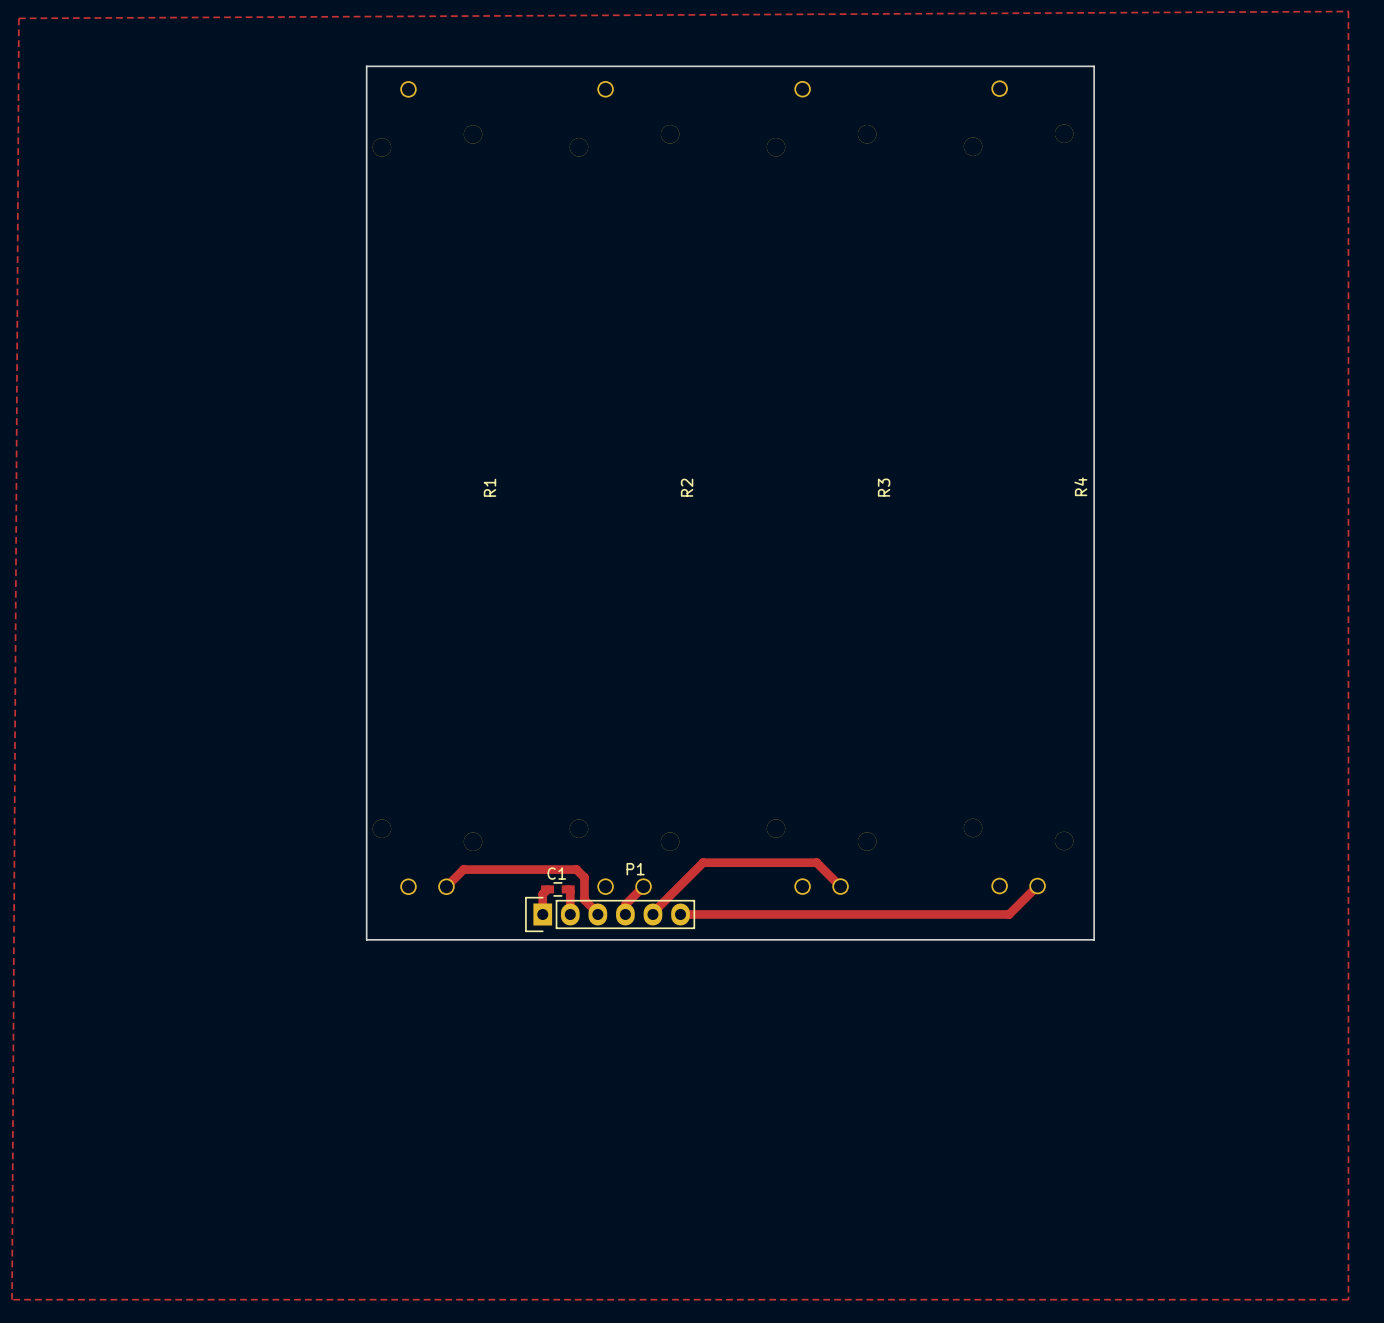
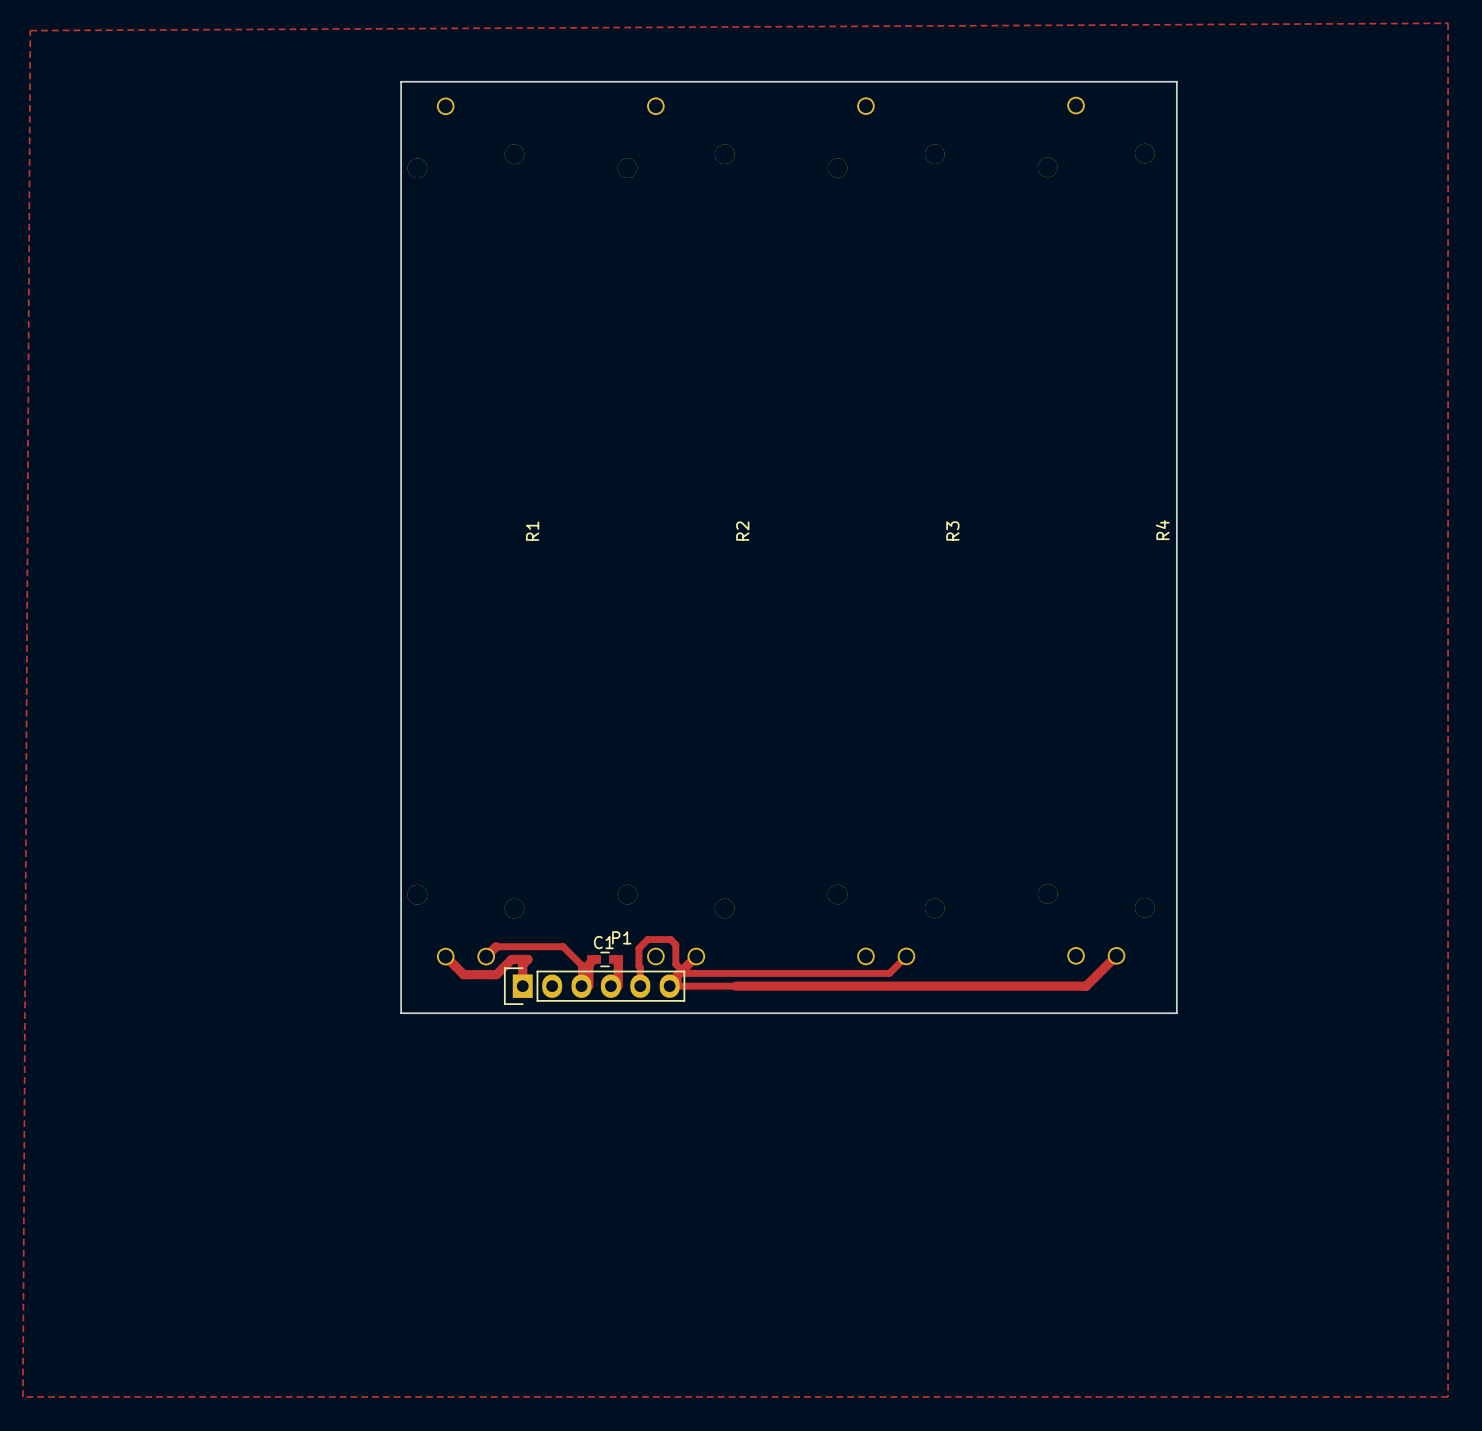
track: (455, 877) (463, 869) (576, 869) (584, 877) (584, 899) (597, 914) -> (496, 946) (563, 946) (581, 965) (581, 986)
track: none -> (445, 956) (463, 974) (496, 974) (511, 959) (527, 959) (522, 964) (522, 986)
track: (840, 886) (816, 862) (703, 862) (652, 914) -> (906, 956) (889, 973) (685, 973) (675, 964) (675, 944) (670, 939) (647, 939) (638, 948) (640, 986)
P1 position: (610, 914) -> (594, 986)
track: none -> (669, 986) (735, 986)

